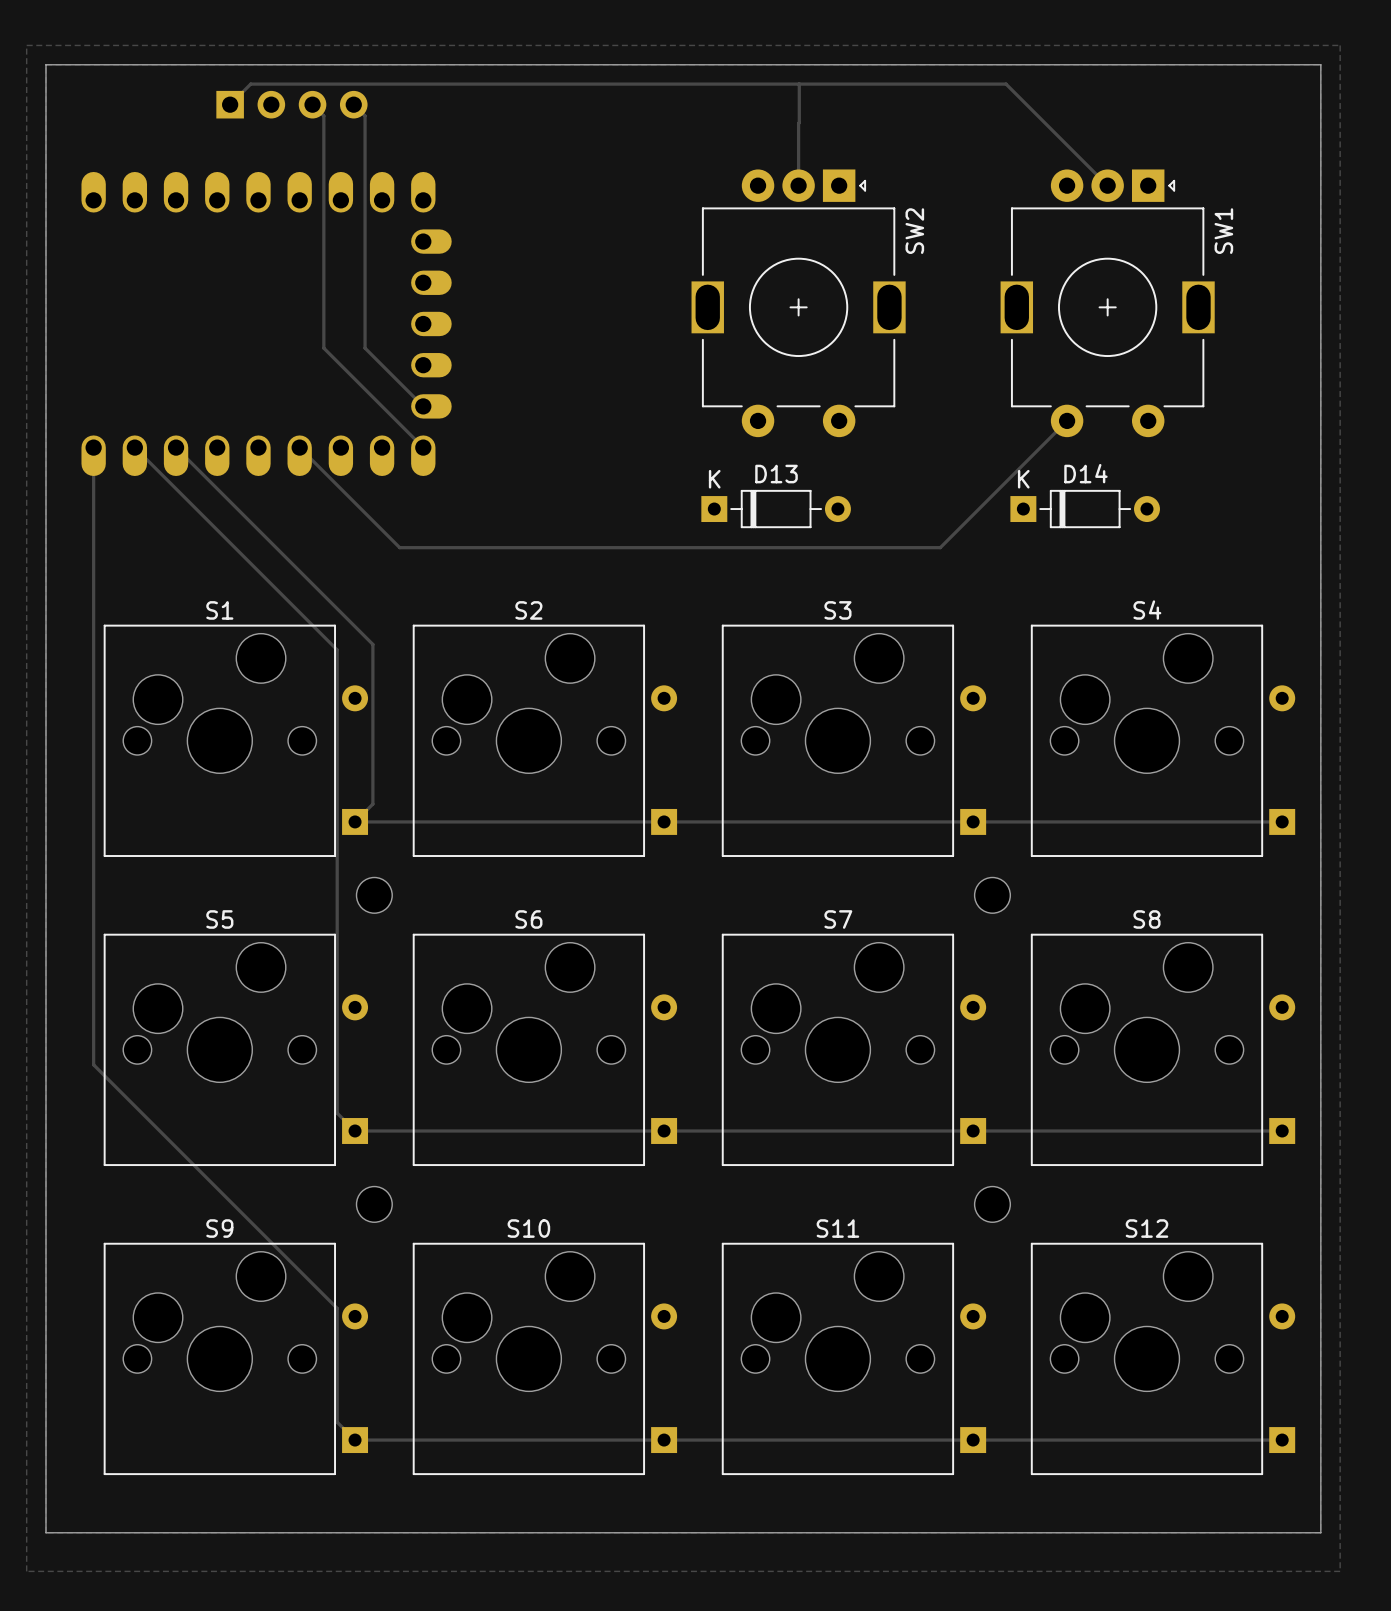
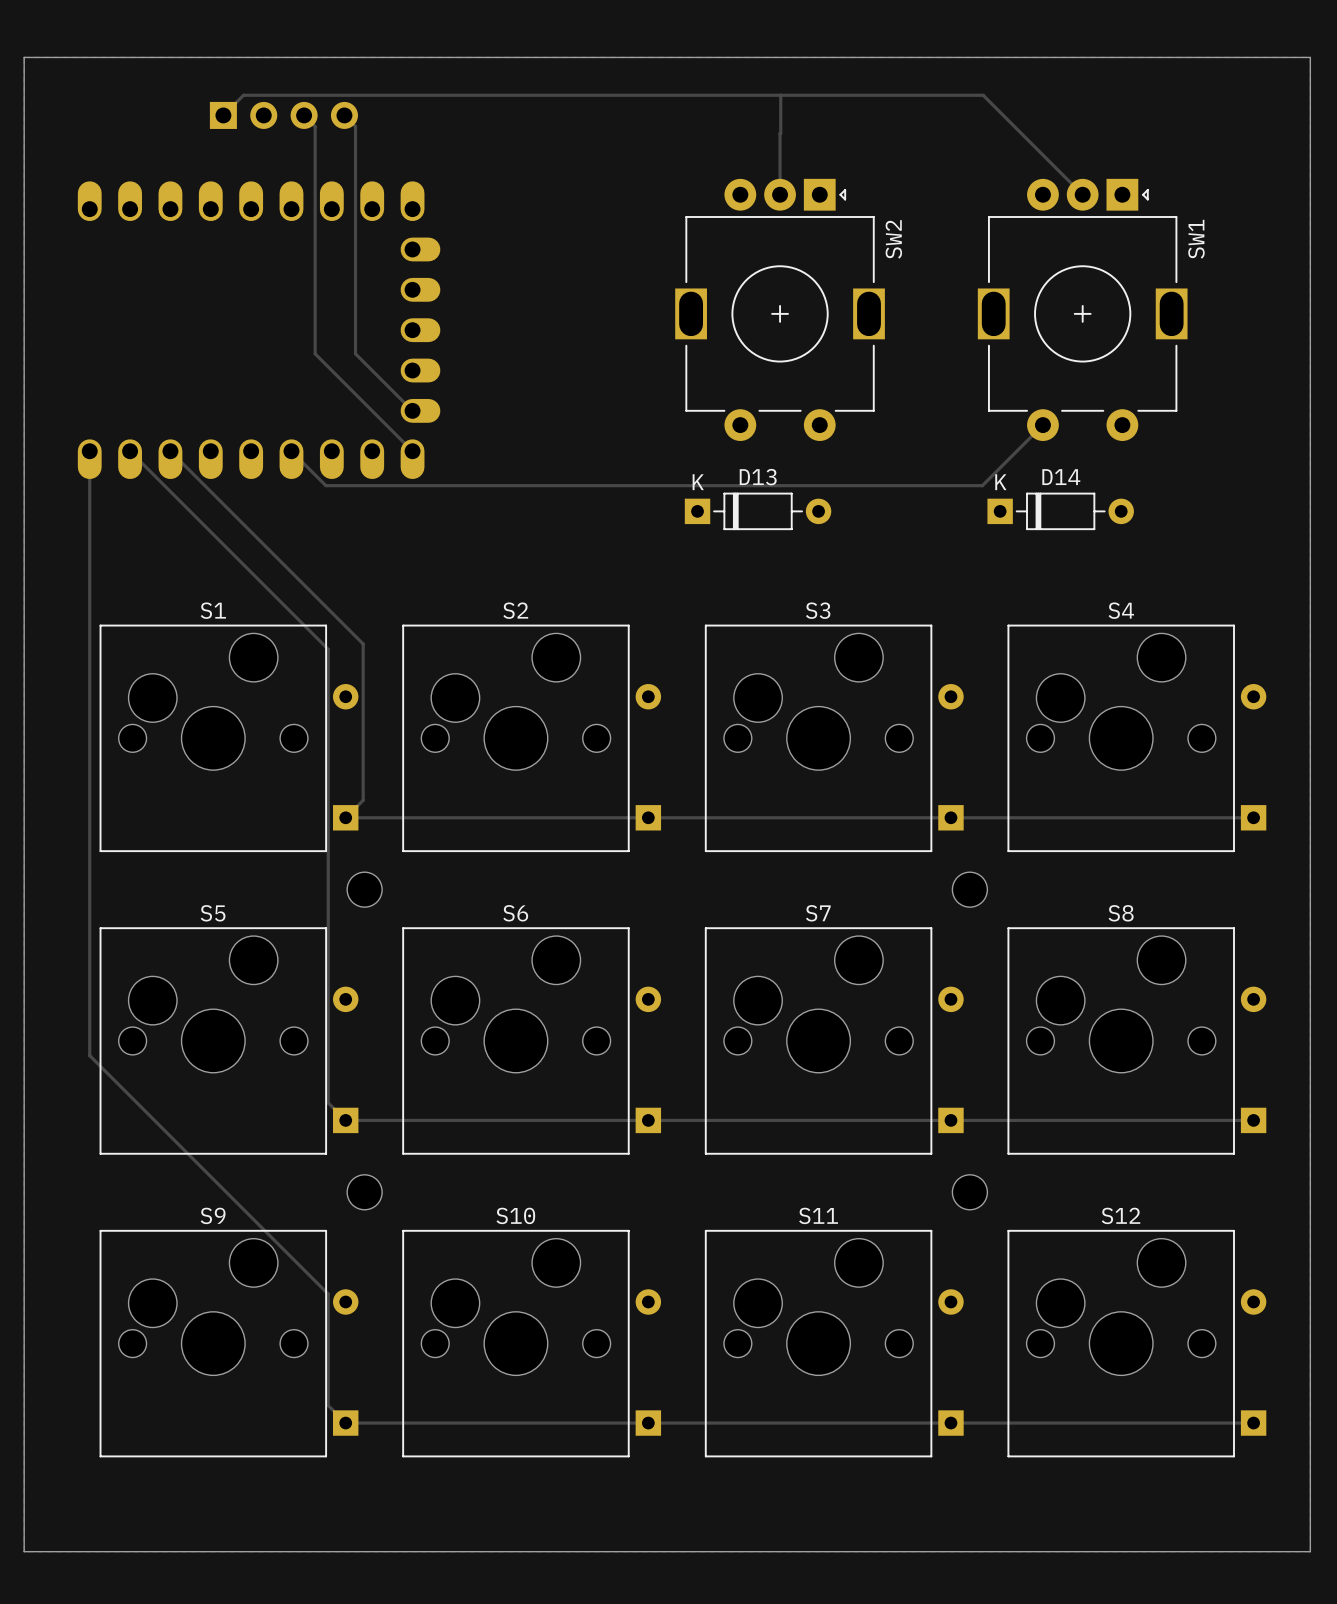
board edge: (45, 64) (1320, 64) (1320, 1532) (45, 1532) (45, 64) -> (24, 57) (24, 1551) (1310, 1551) (1310, 57) (24, 57)
track: (334, 482) (399, 547) (940, 547) (1005, 482) -> (325, 485) (982, 485)

